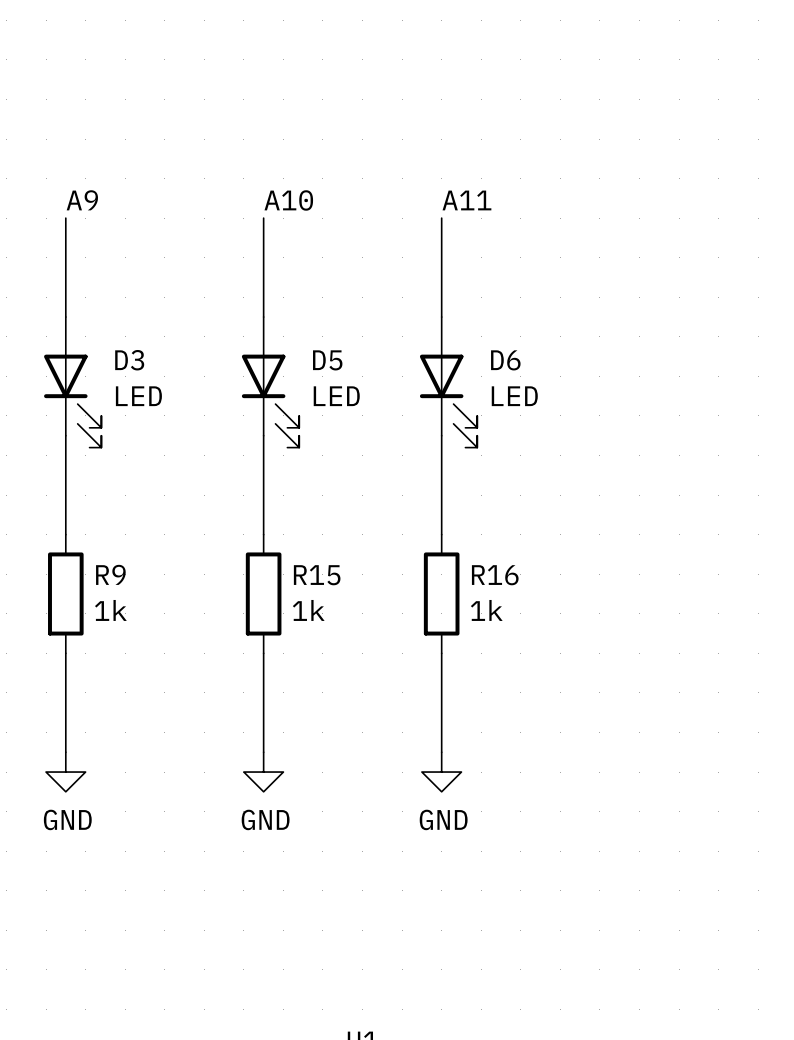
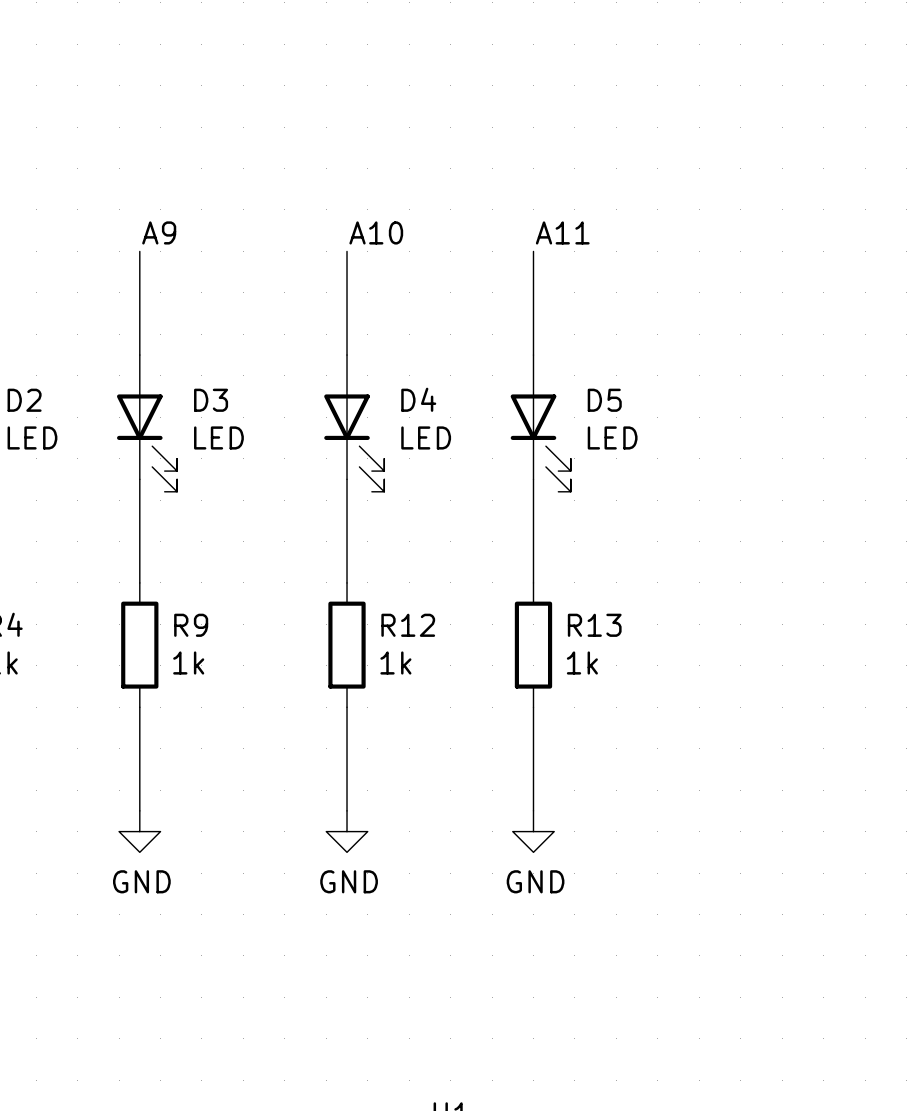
D5 name: D5 (327, 360) -> D4 (418, 399)
D6 name: D6 (505, 360) -> D5 (604, 400)
R15 name: R15 (317, 575) -> R12 (408, 625)
R16 name: R16 (495, 575) -> R13 (594, 625)

